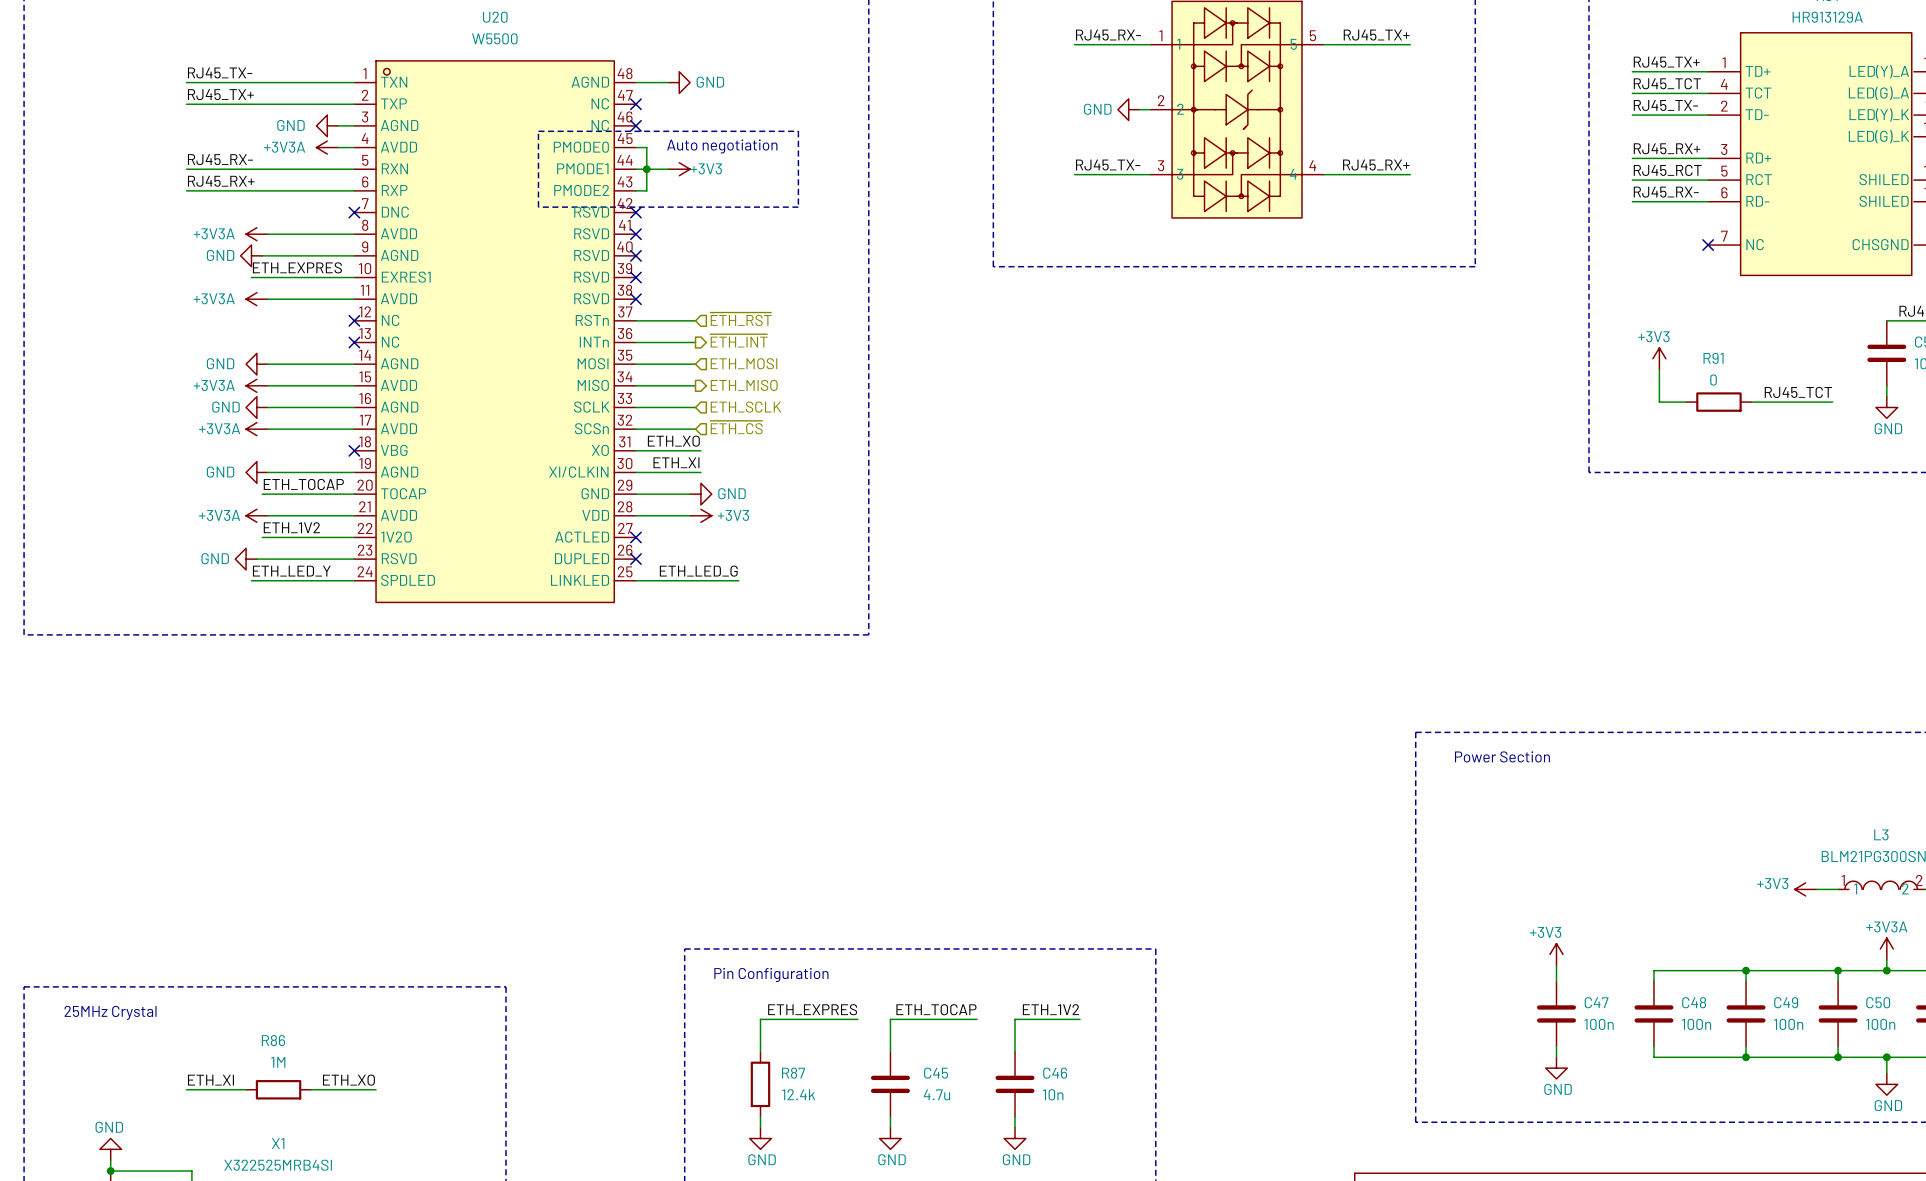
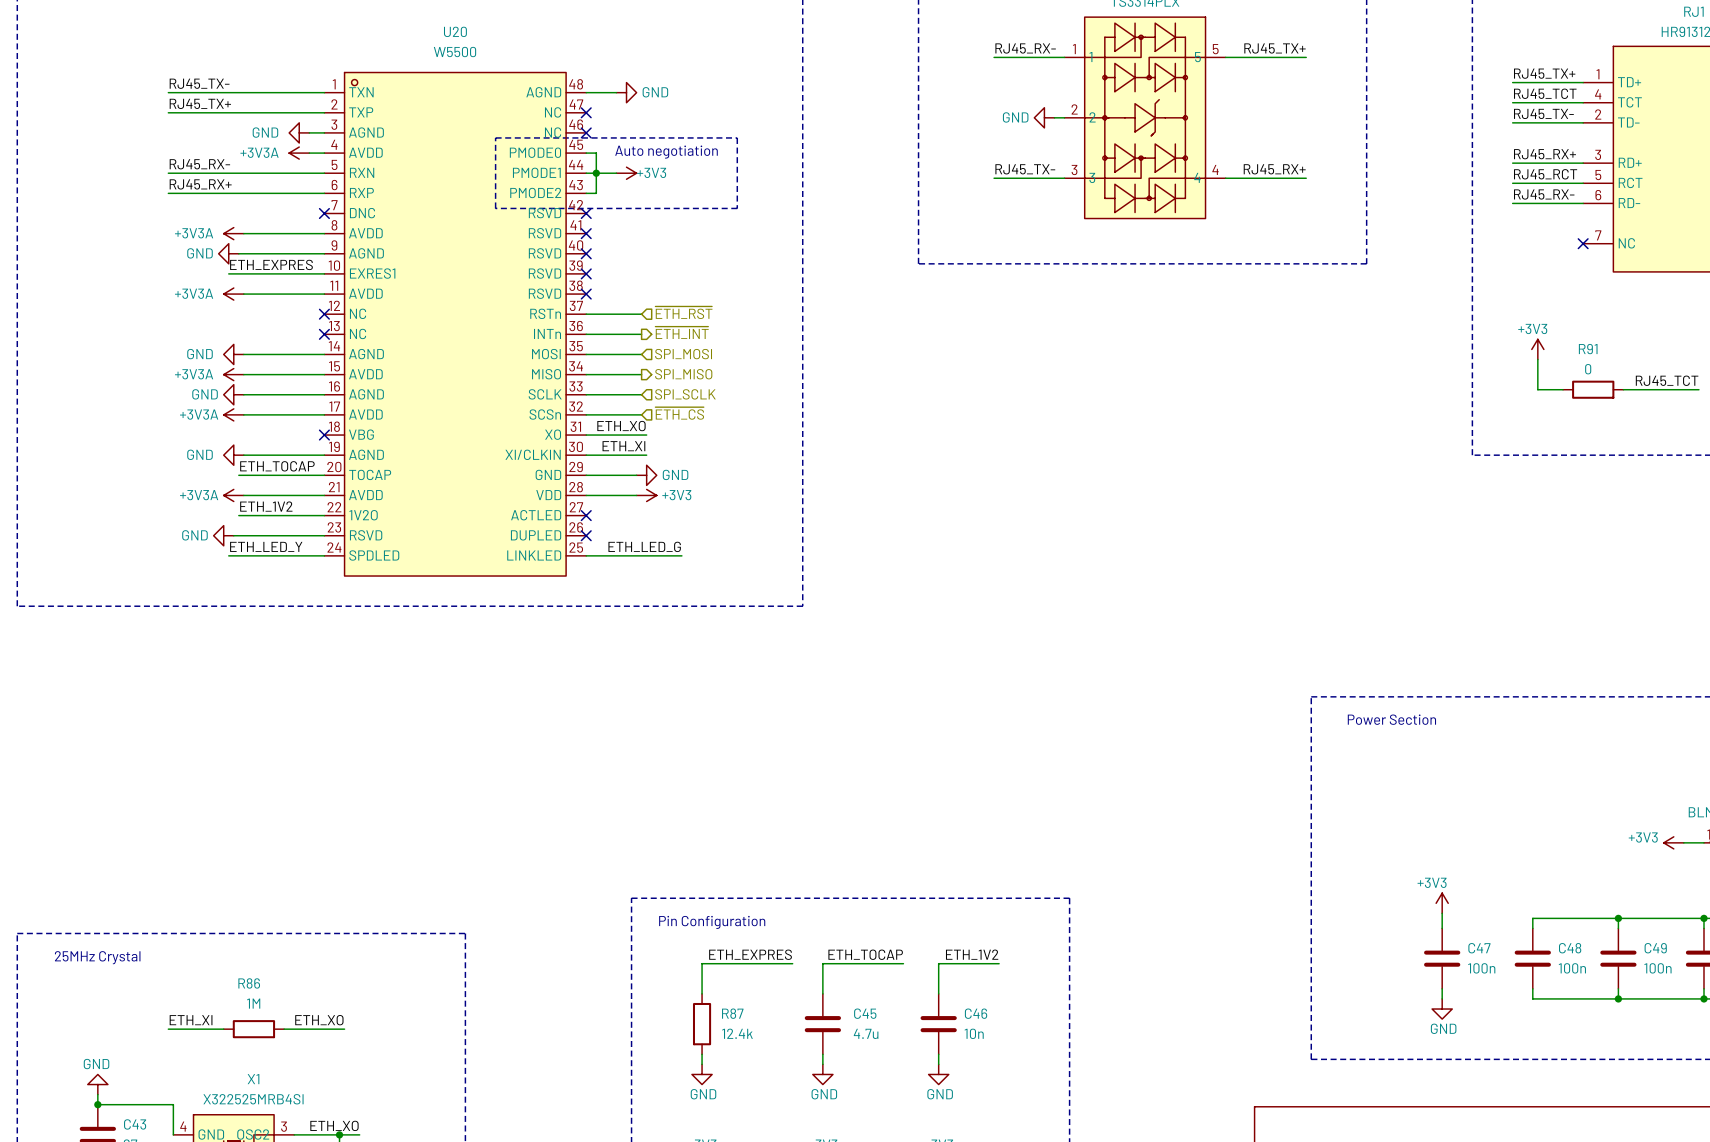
hierarchical label: ETH_MOSI (744, 363) -> SPI_MOSI (683, 354)
hierarchical label: ETH_MISO (744, 385) -> SPI_MISO (683, 374)
hierarchical label: ETH_SCLK (746, 407) -> SPI_SCLK (685, 394)

